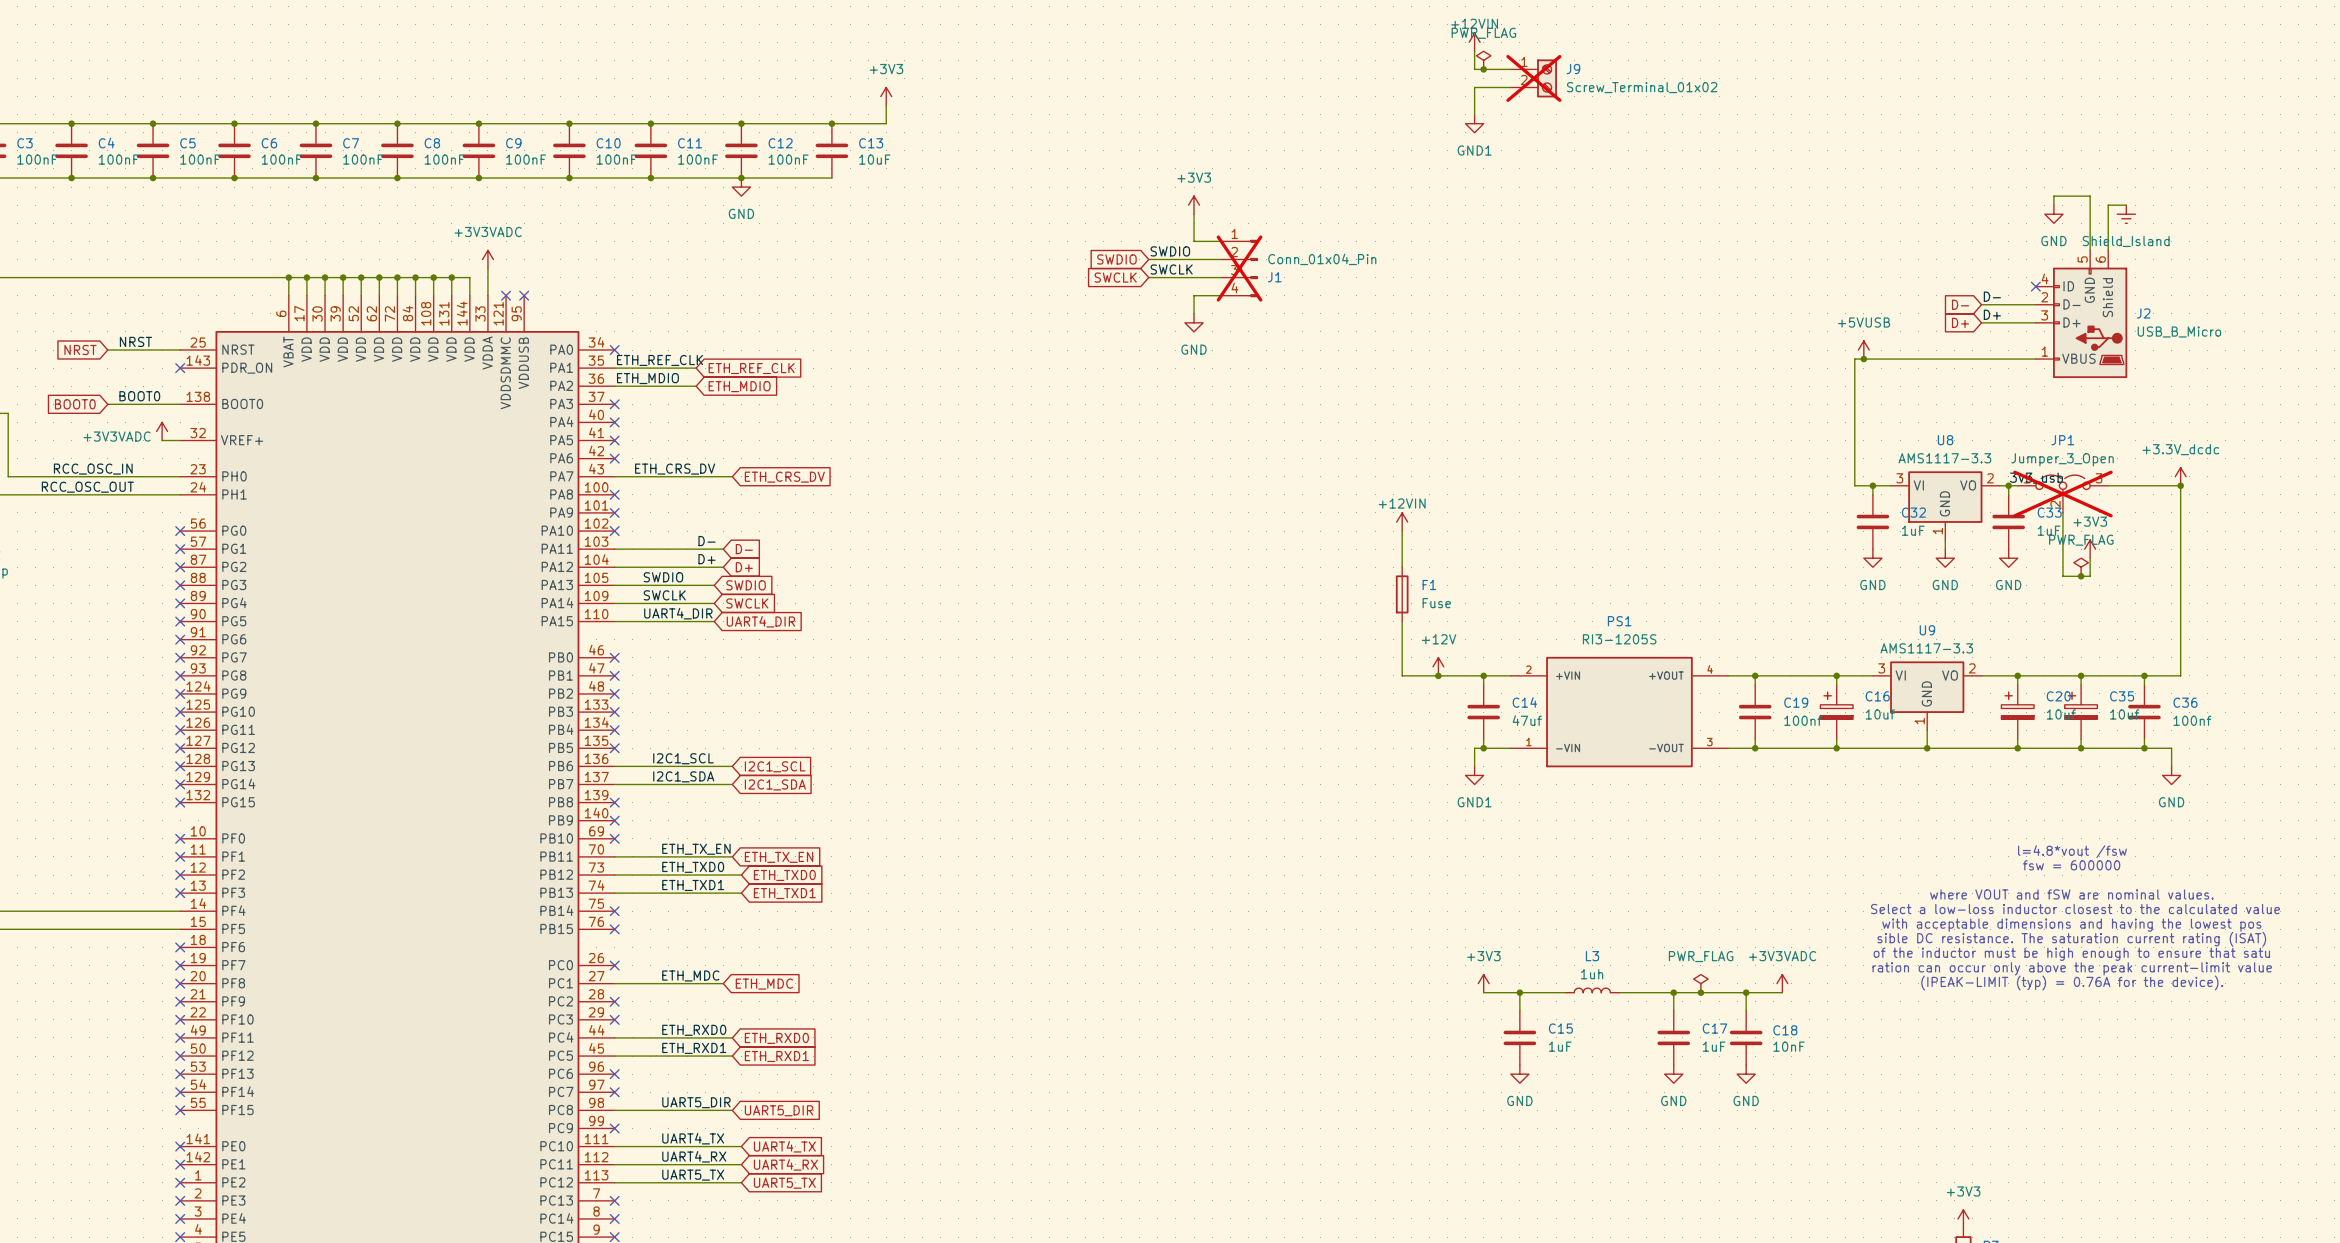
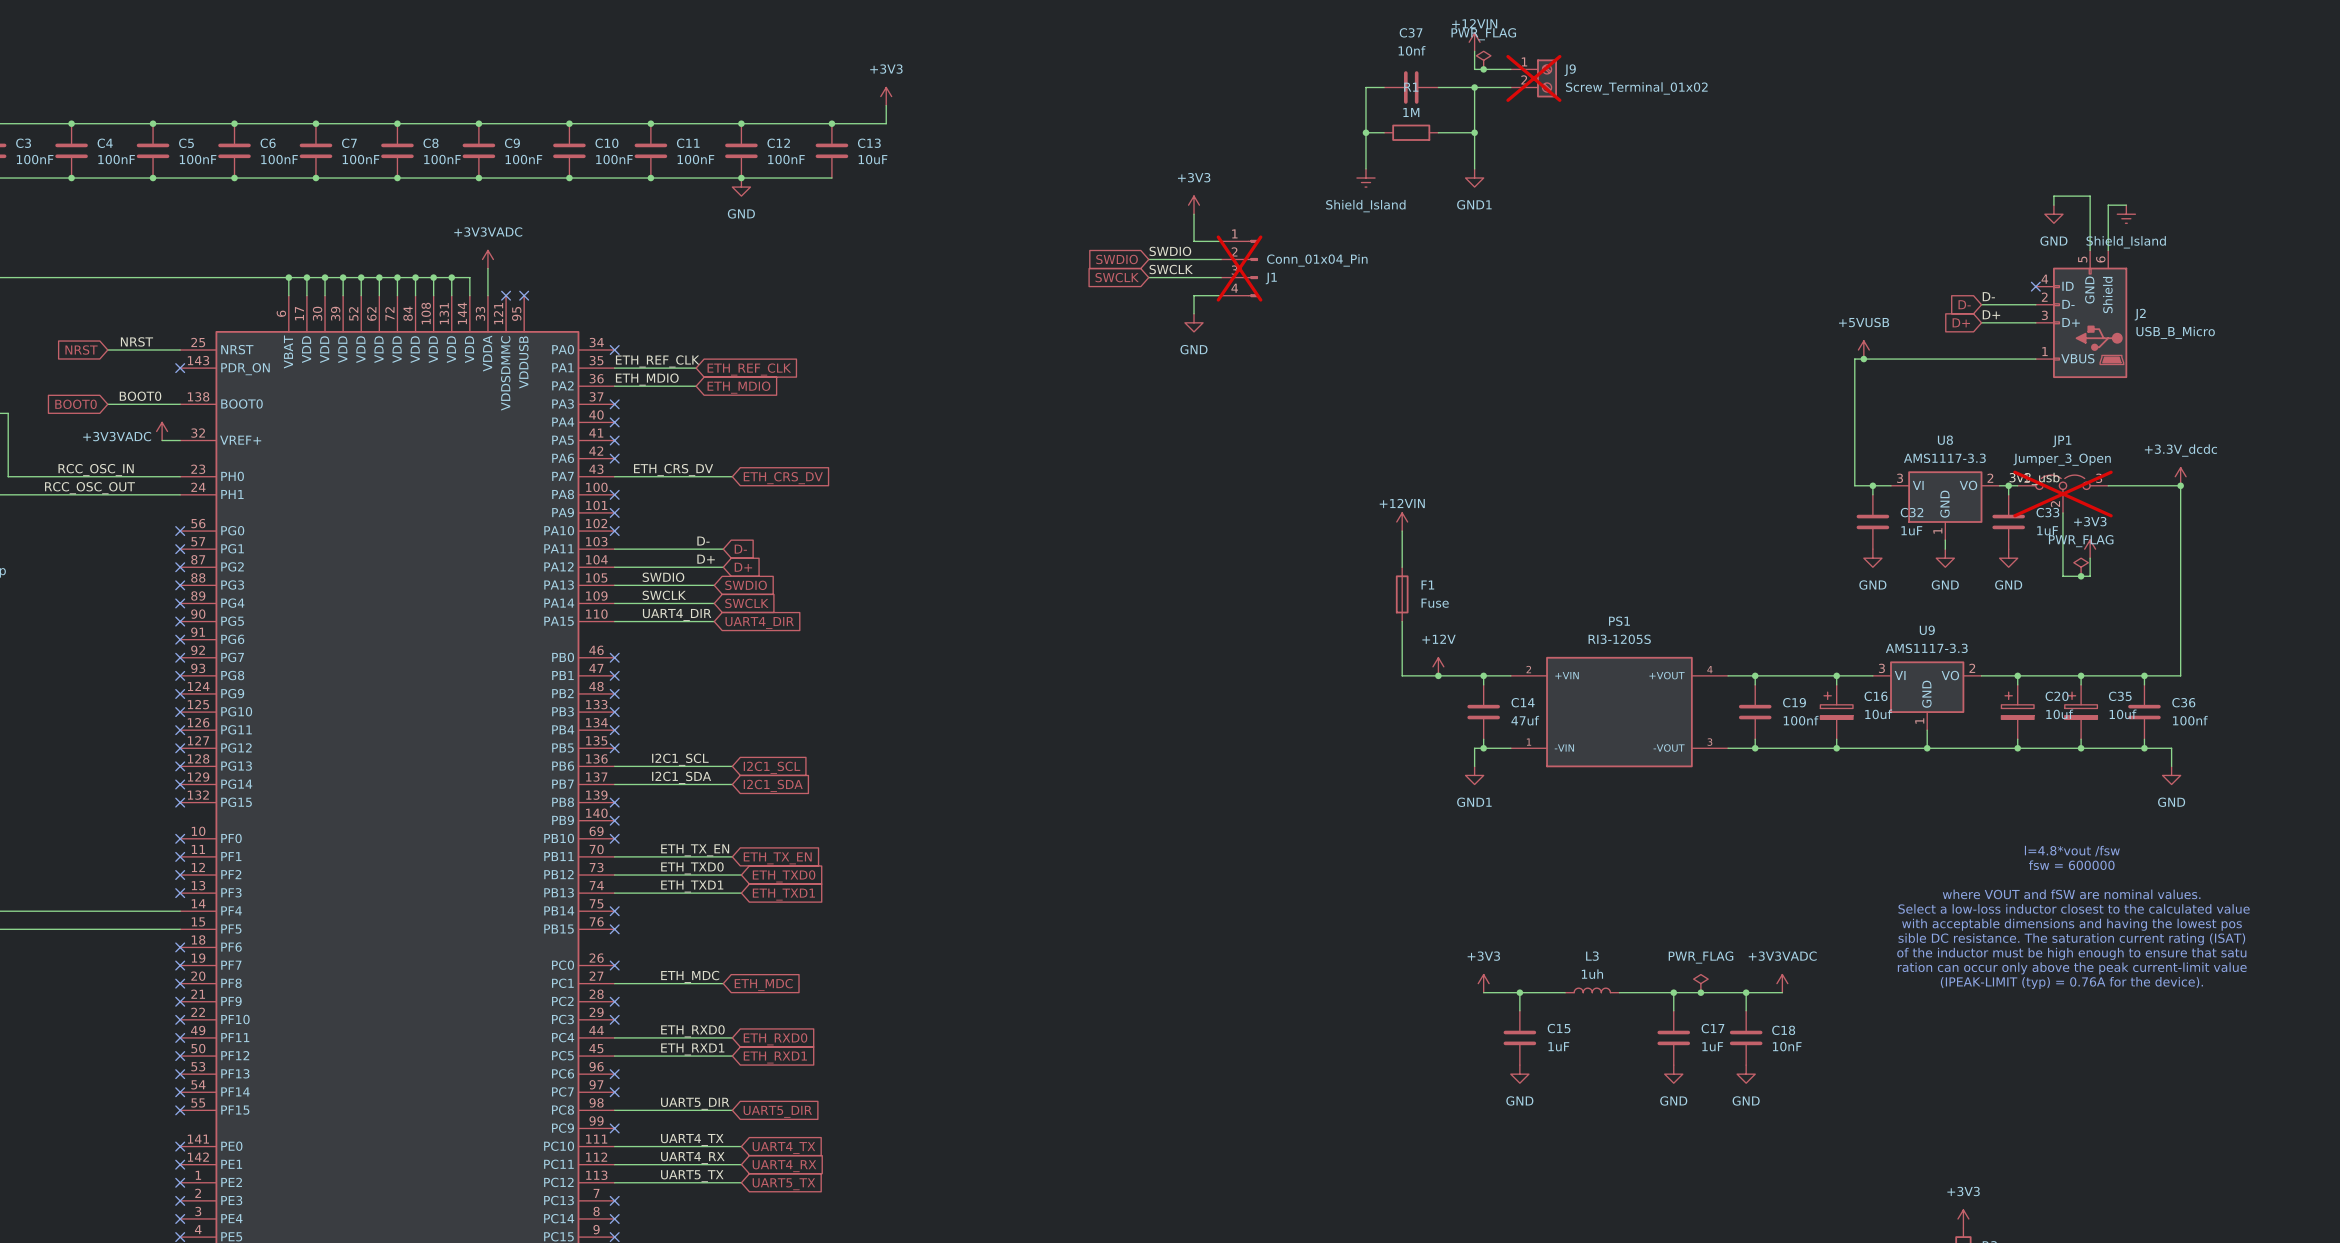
wire: none -> (1384, 87) (1365, 87) (1365, 168)
C37: none -> 10nf (1411, 87)
wire: none -> (1438, 87) (1474, 87)
junction: none -> (1474, 87)
wire: none -> (1474, 114) (1474, 168)
power symbol position: GND1 (1474, 123) -> GND1 (1474, 178)
wire: none -> (1365, 132) (1384, 132)
junction: none -> (1365, 132)
R1: none -> 1M (1411, 132)
wire: none -> (1438, 132) (1474, 132)
junction: none -> (1474, 132)
power symbol: none -> Shield_Island (1365, 178)

